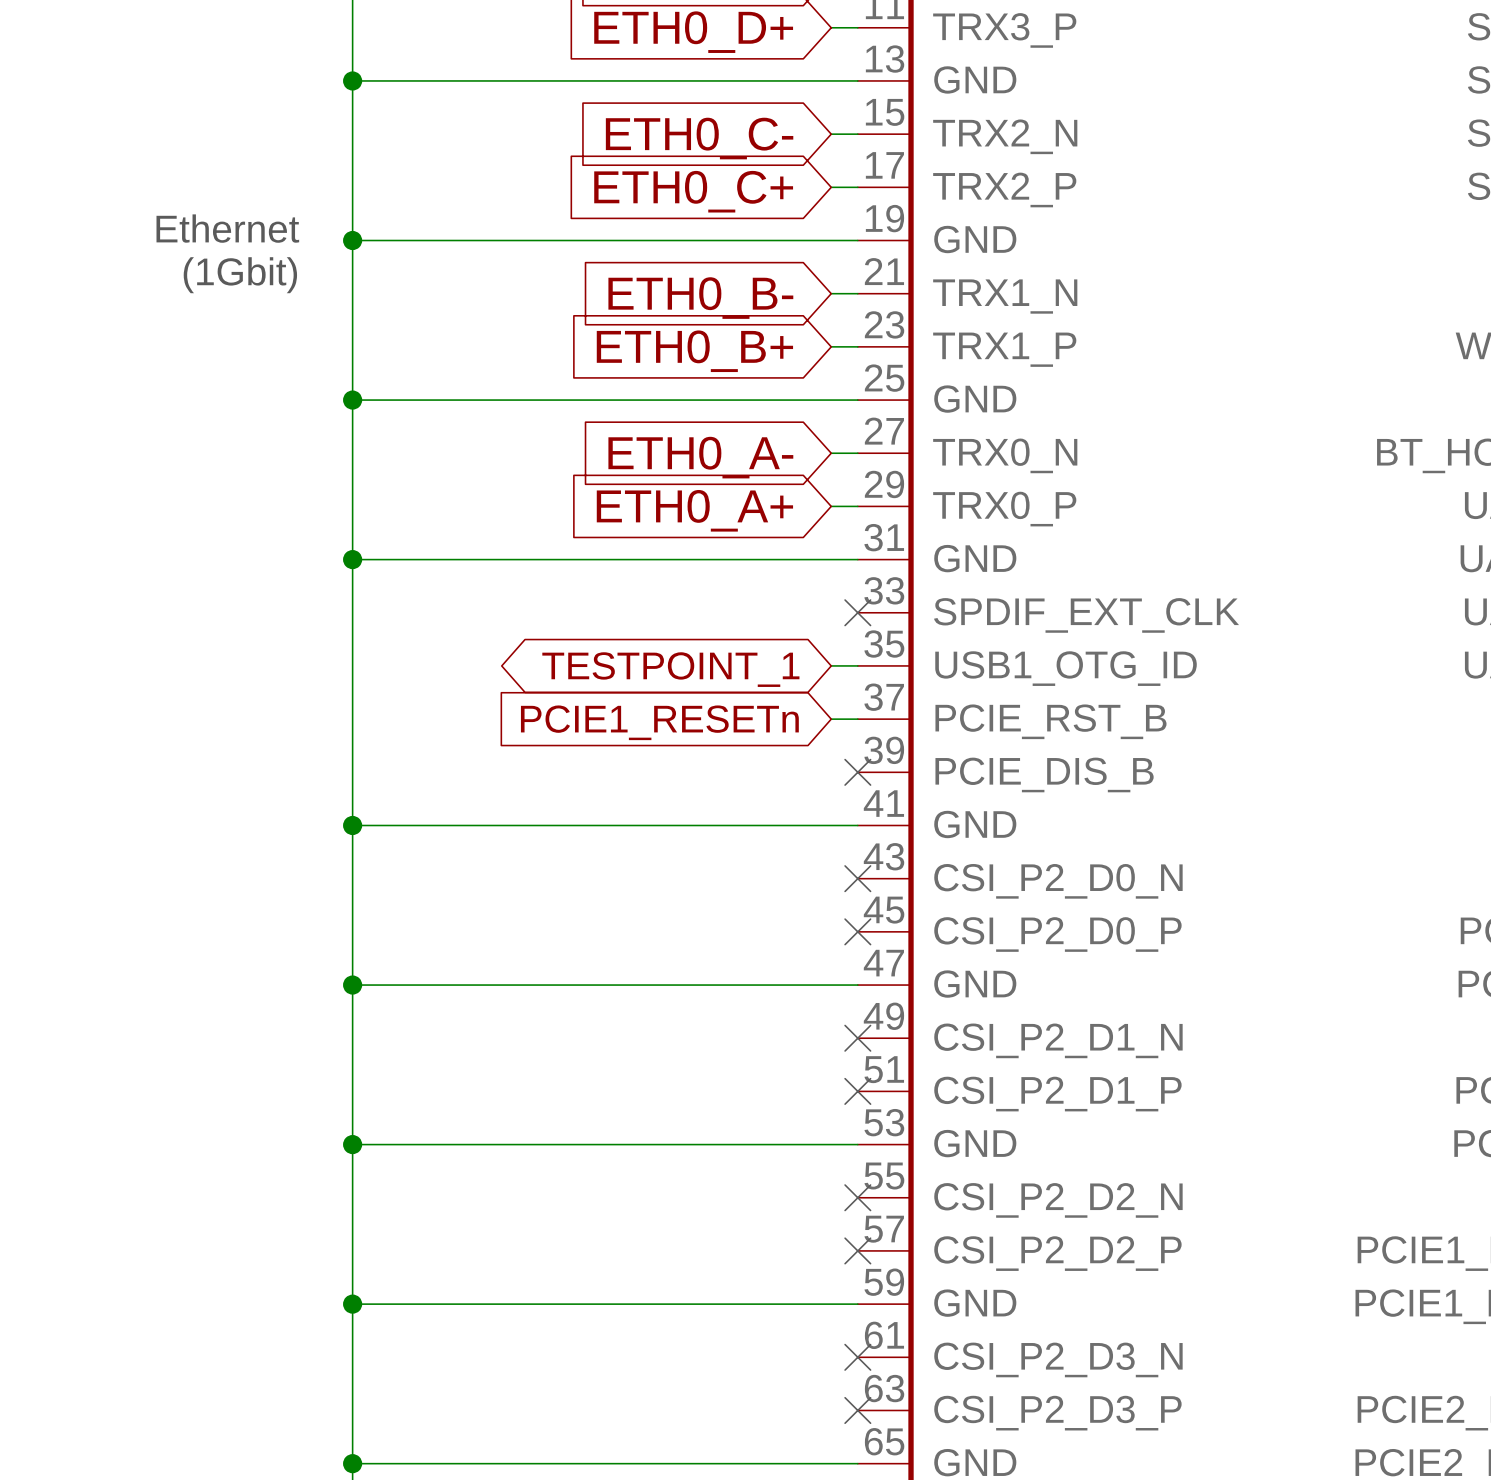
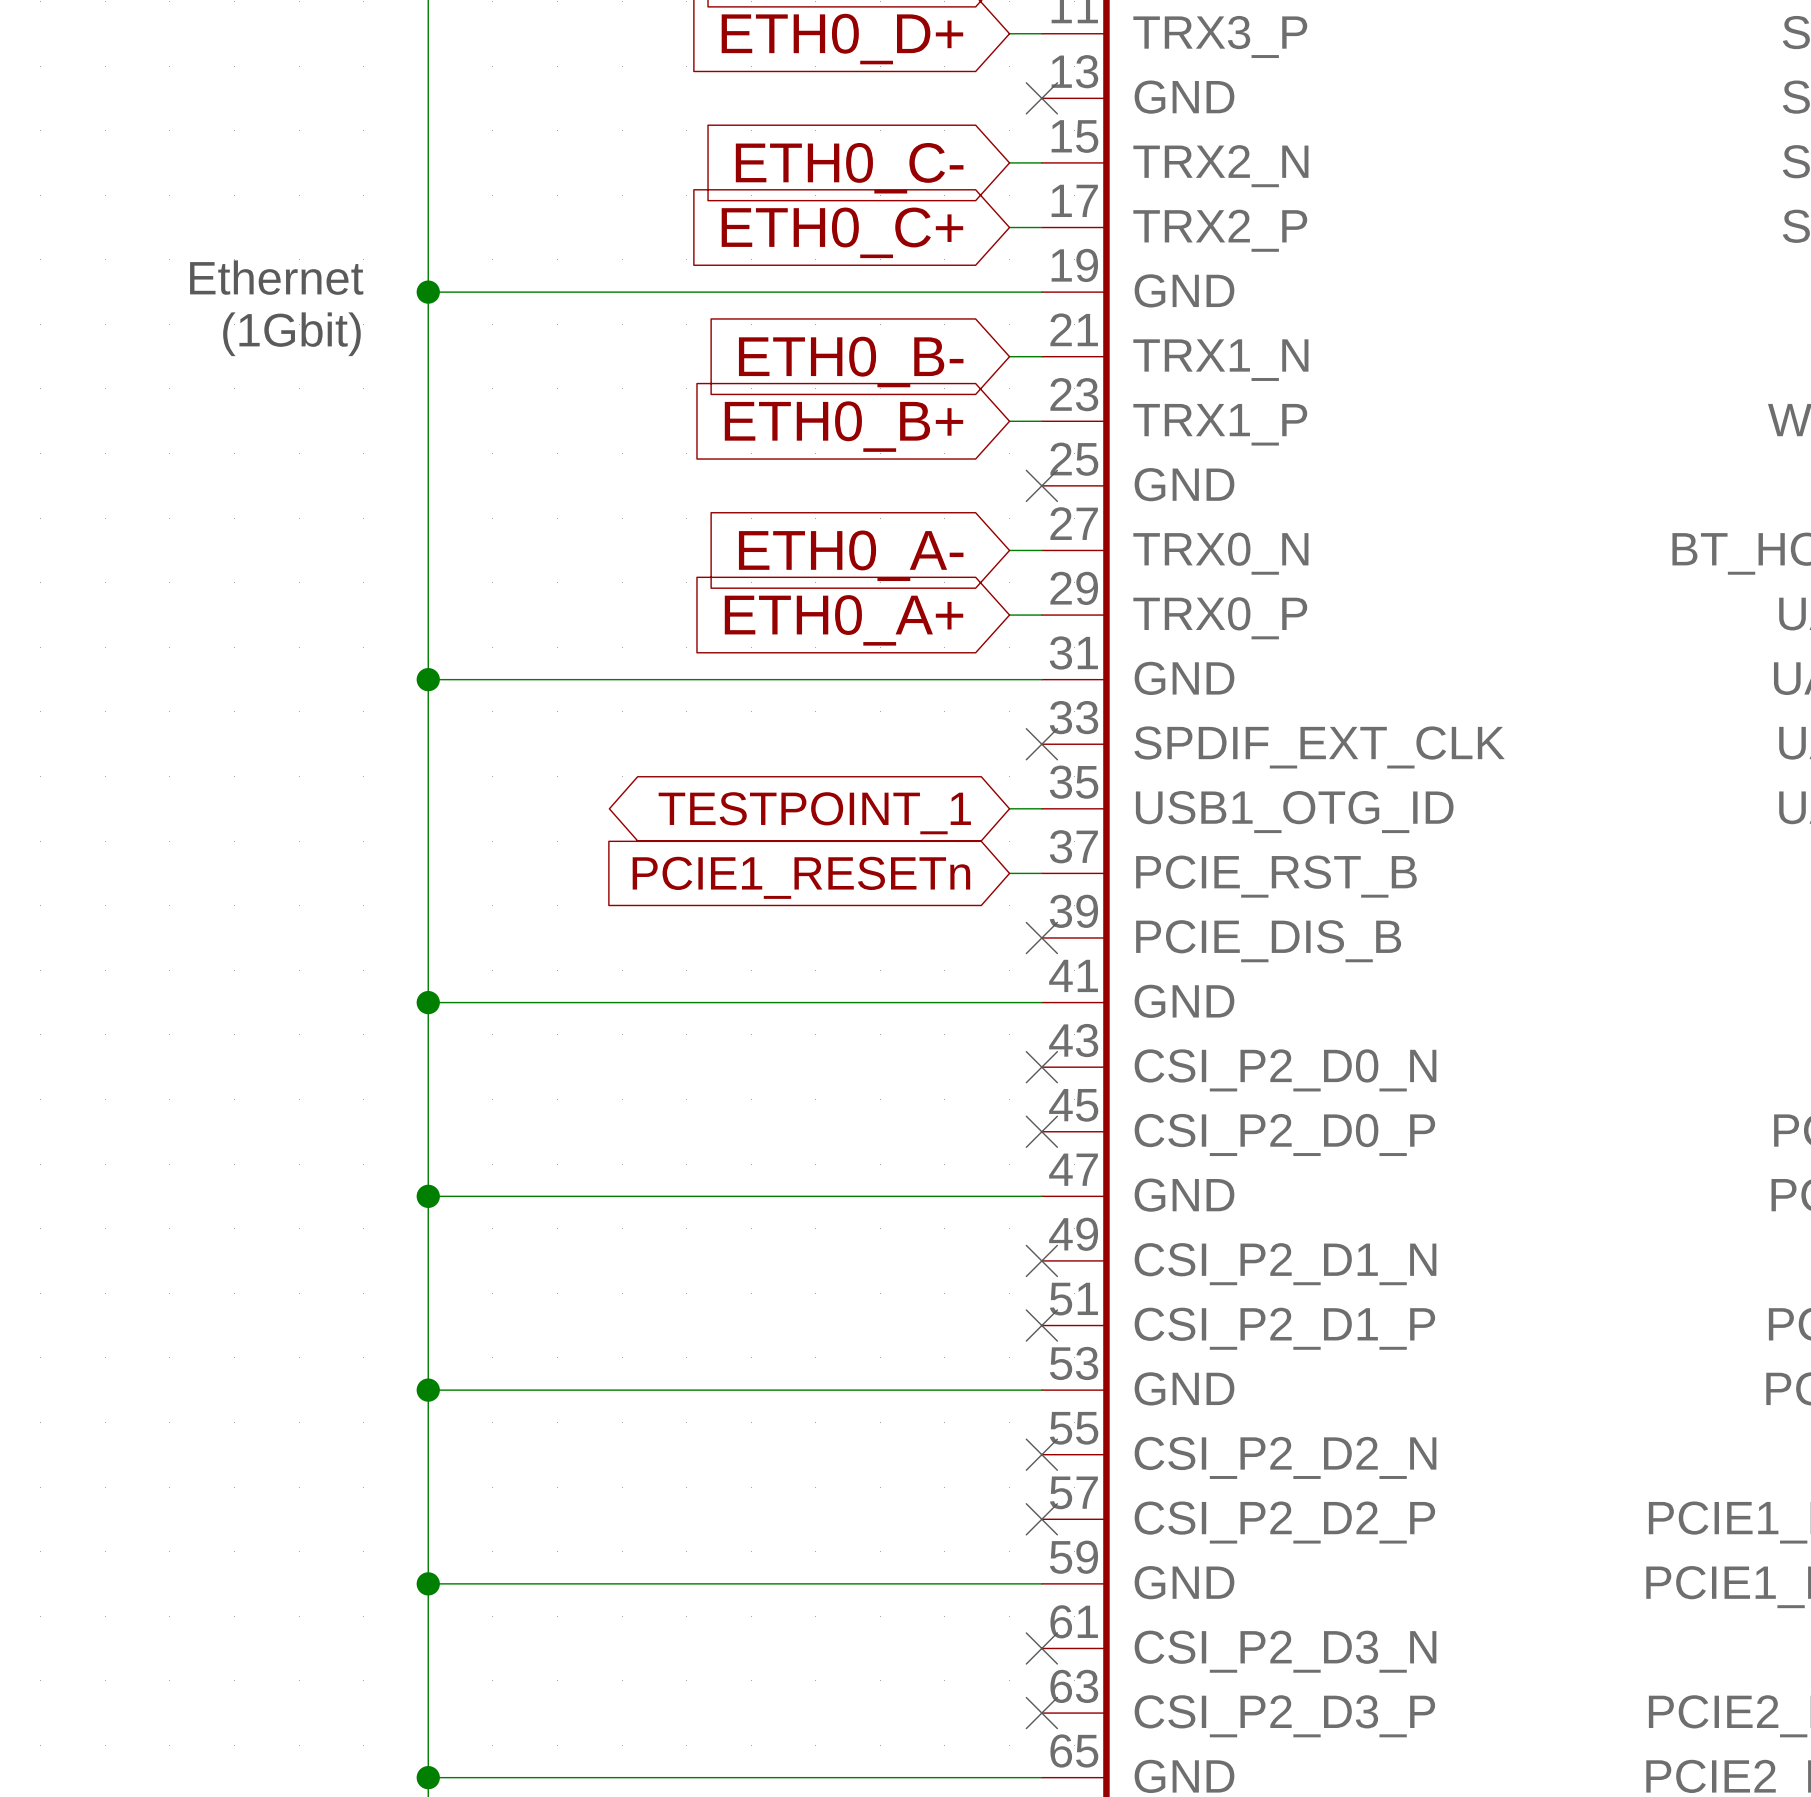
wire: (352, 80) (857, 80) -> none
junction: (352, 80) -> none
no-connect mark: none -> (1041, 98)
wire: (352, 400) (857, 400) -> none
junction: (352, 400) -> none
no-connect mark: none -> (1041, 485)

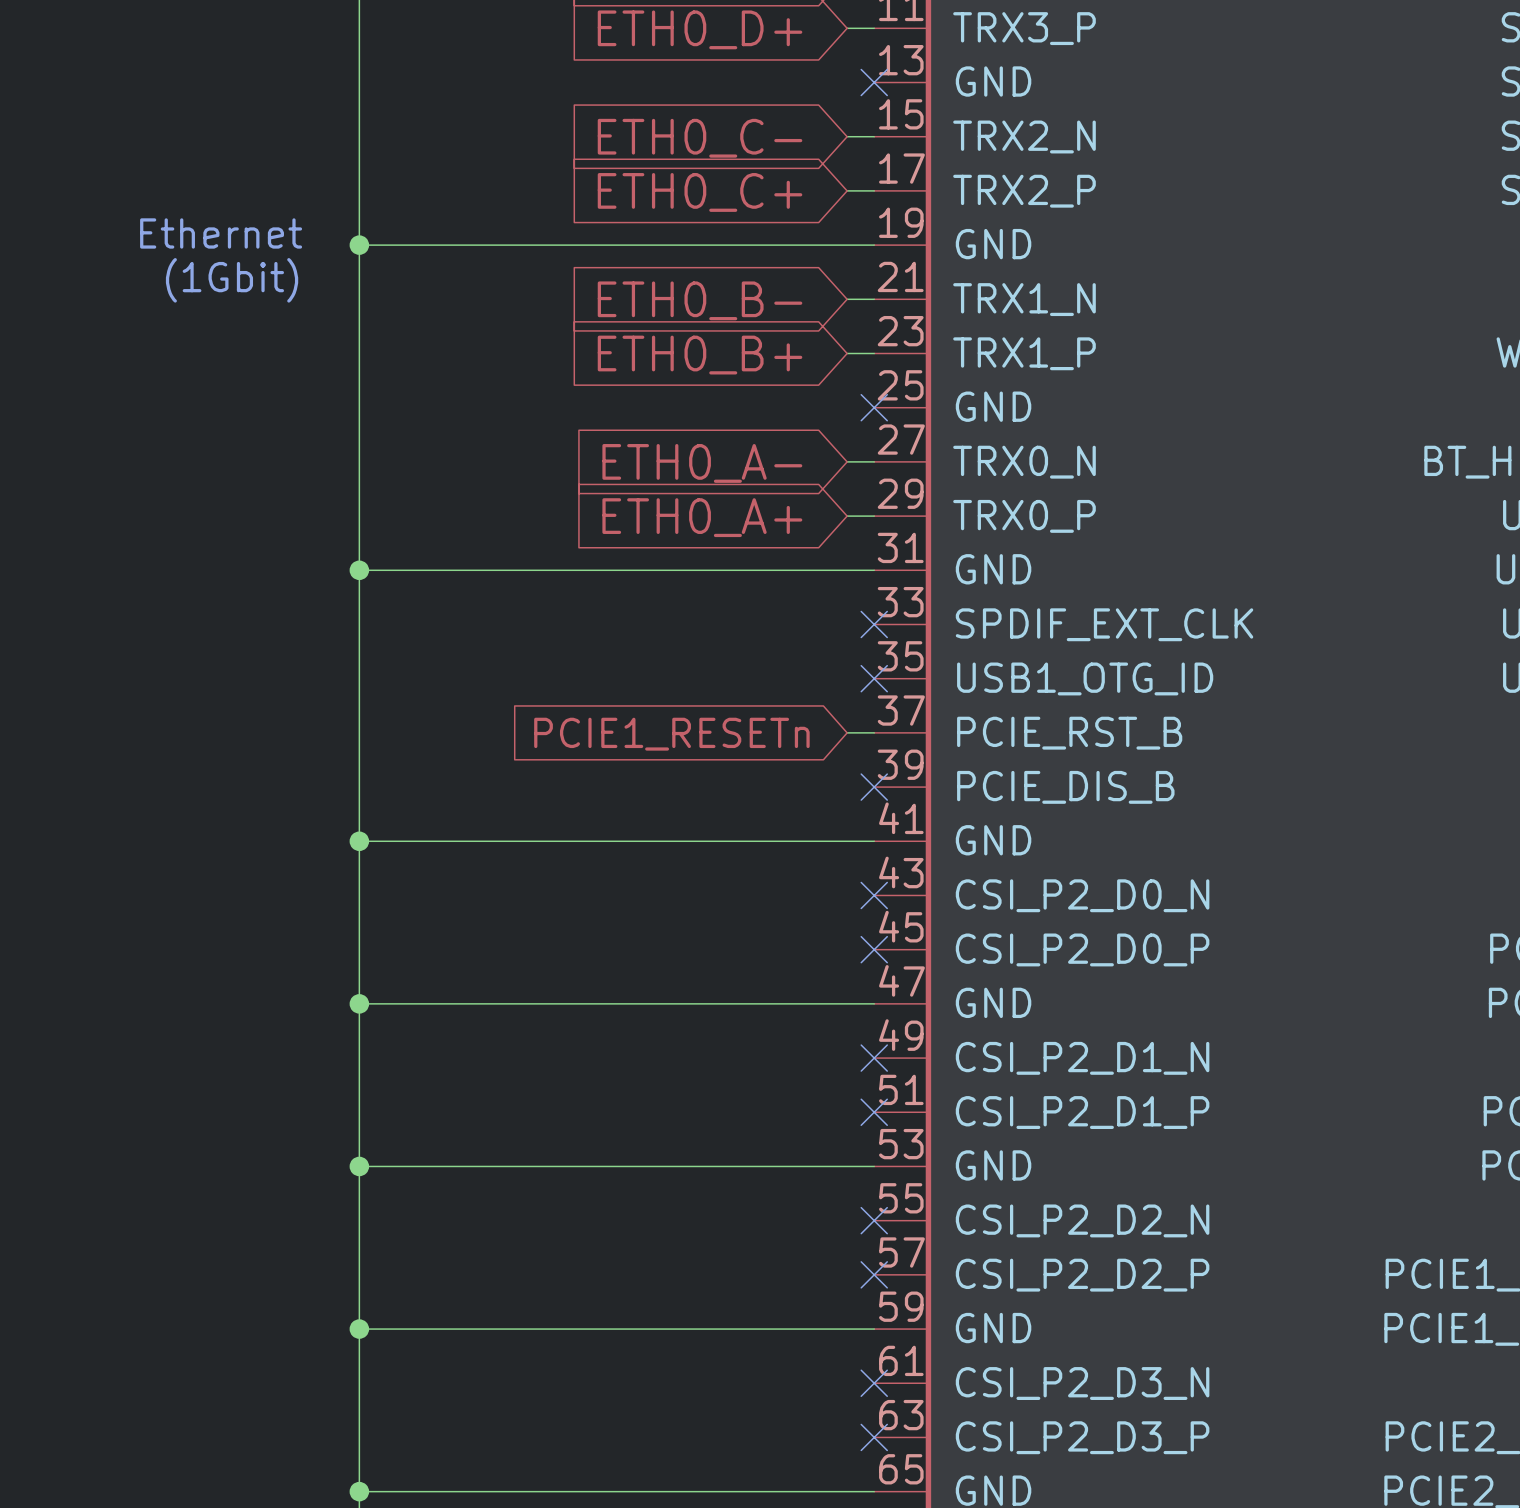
wire: (1009, 808) (1041, 808) -> none
no-connect mark: none -> (874, 678)
global label: TESTPOINT_1 (814, 813) -> none

